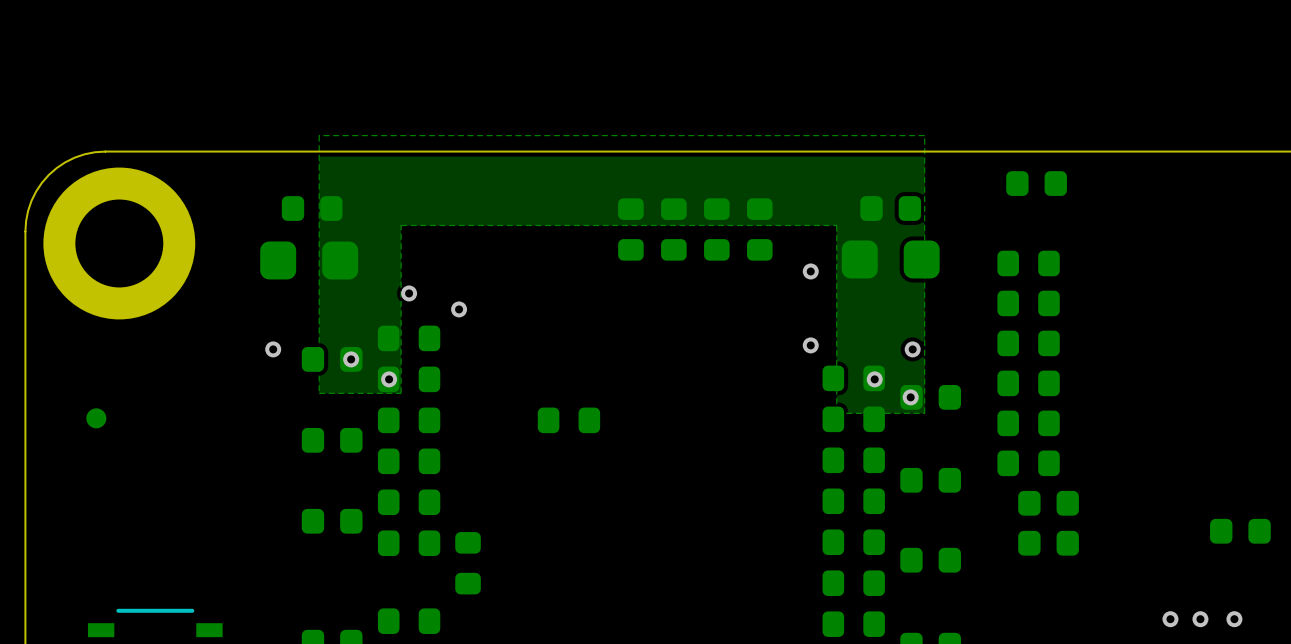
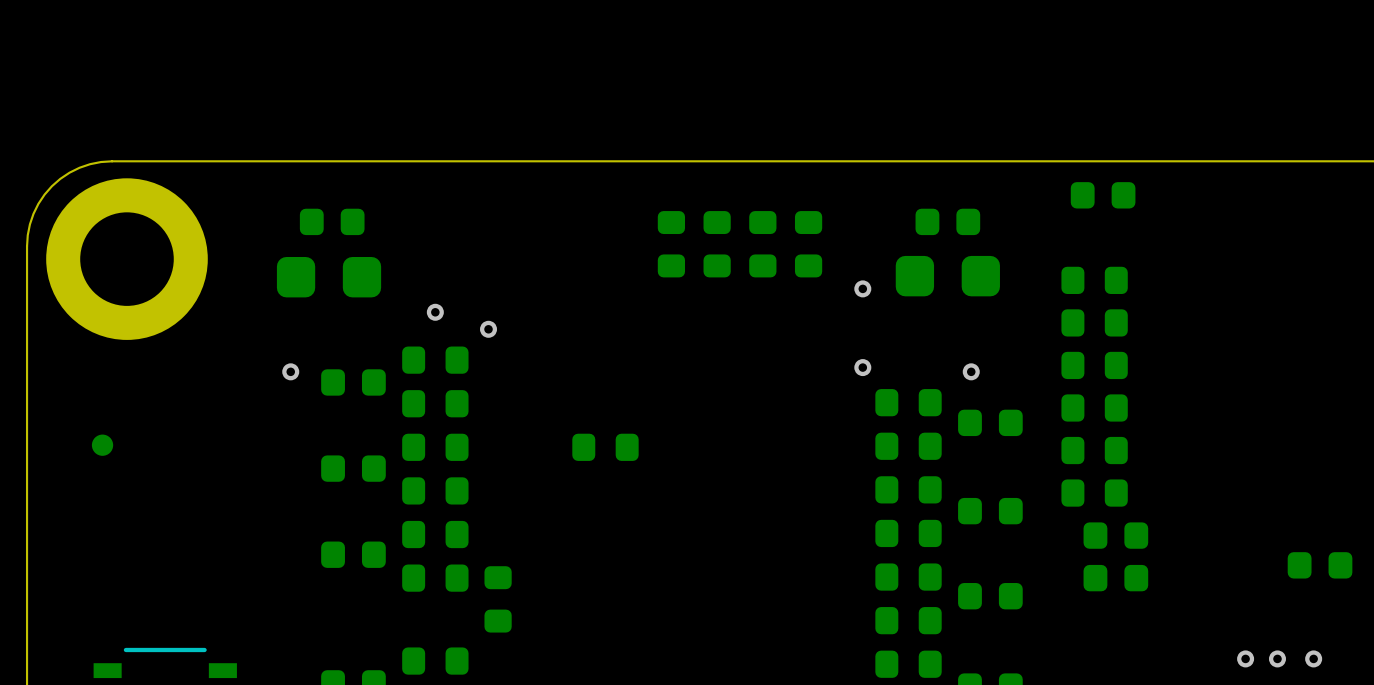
zone outline: (924, 135) (924, 413) (836, 413) (836, 225) (401, 225) (401, 393) (319, 393) (319, 135) (924, 135) -> none
via: (351, 359) -> none
via: (389, 379) -> none
via: (874, 379) -> none
via: (910, 397) -> none

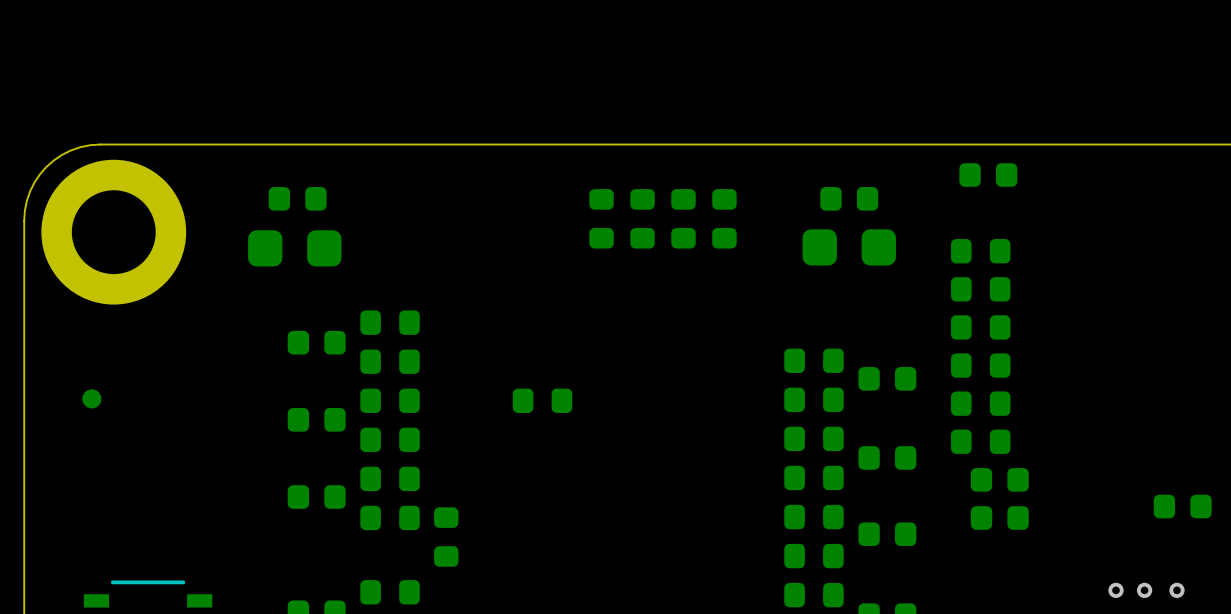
via: (862, 288) -> none
via: (435, 312) -> none
via: (488, 329) -> none
via: (862, 367) -> none
via: (290, 371) -> none
via: (971, 371) -> none

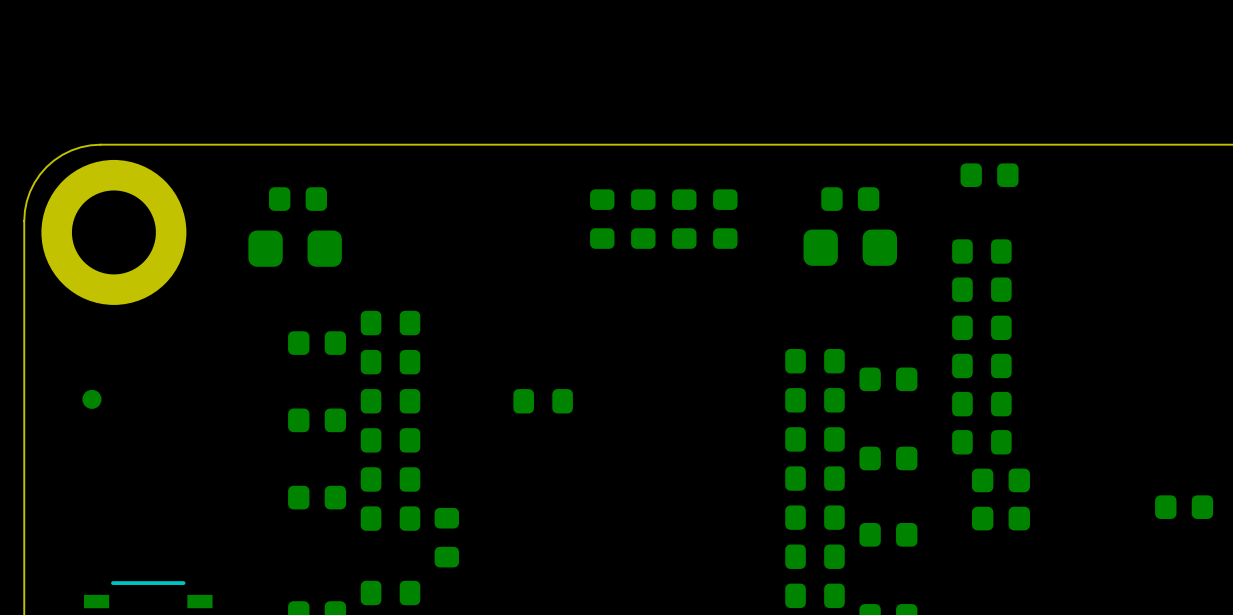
via: (1116, 590) -> none
via: (1144, 590) -> none
via: (1176, 590) -> none

